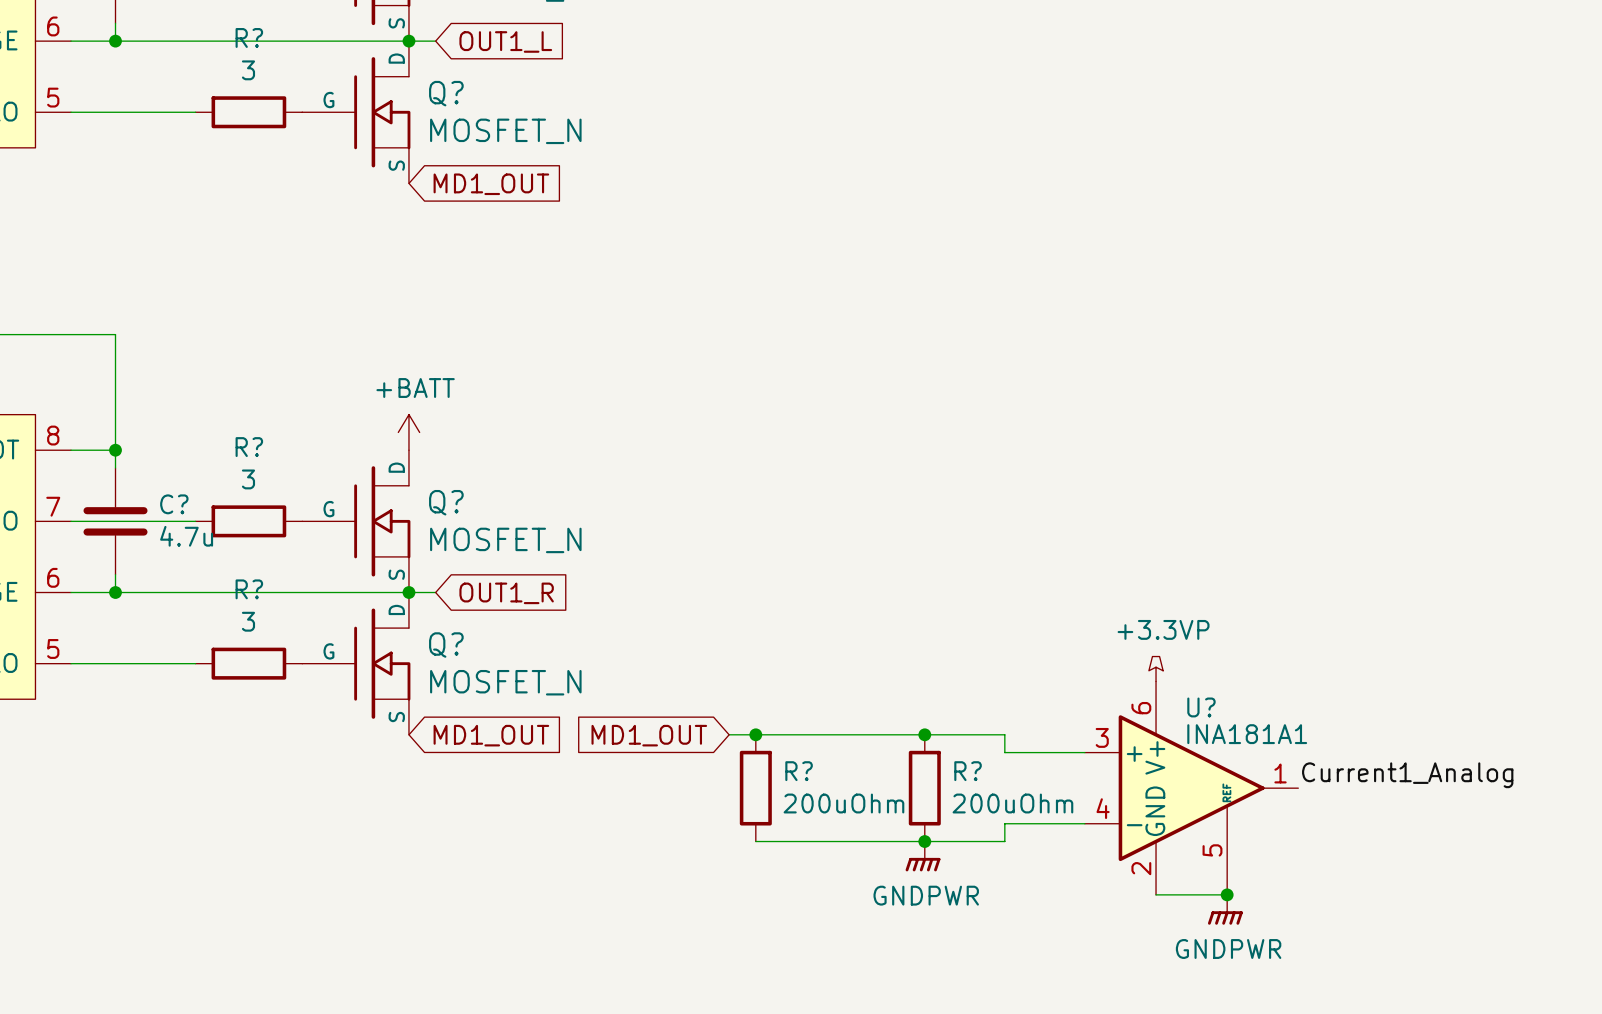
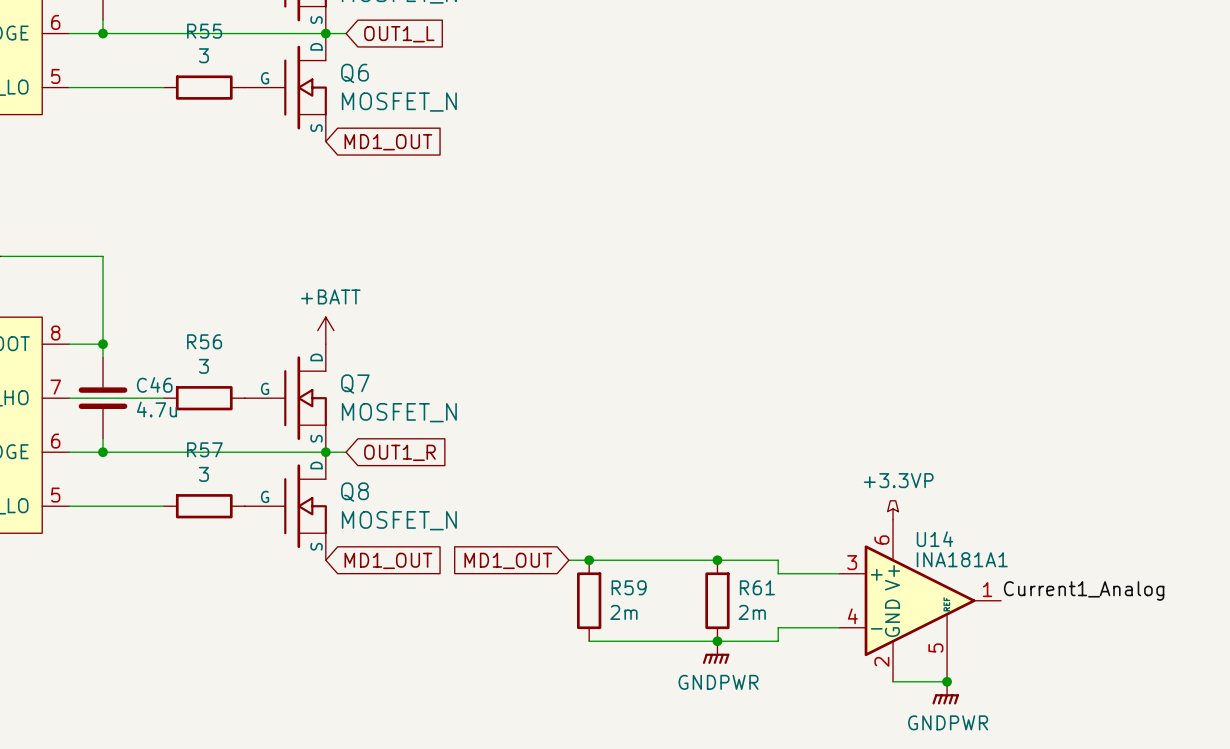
R? name: R? (249, 37) -> R55 (204, 31)
Q? name: Q? (446, 93) -> Q6 (354, 73)
R? name: R? (249, 447) -> R56 (204, 341)
Q? name: Q? (446, 502) -> Q7 (355, 384)
C? name: C? (174, 504) -> C46 (154, 384)
R? name: R? (249, 589) -> R57 (204, 449)
Q? name: Q? (446, 645) -> Q8 (354, 492)
U? name: U? (1201, 707) -> U14 (934, 539)
R? name: R? (799, 771) -> R59 (629, 587)
R? name: R? (968, 771) -> R61 (757, 587)
R? value: 200uOhm (843, 803) -> 2m (623, 612)
R? value: 200uOhm (1012, 803) -> 2m (752, 612)

